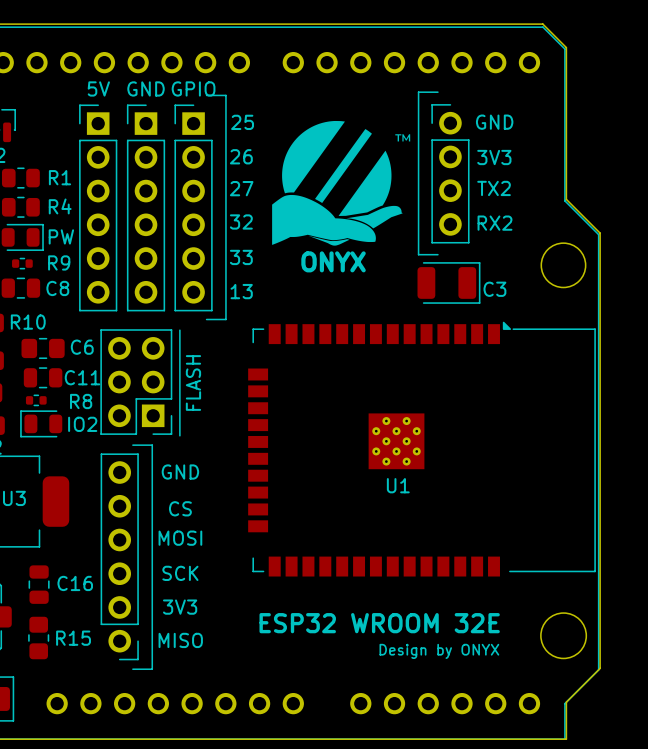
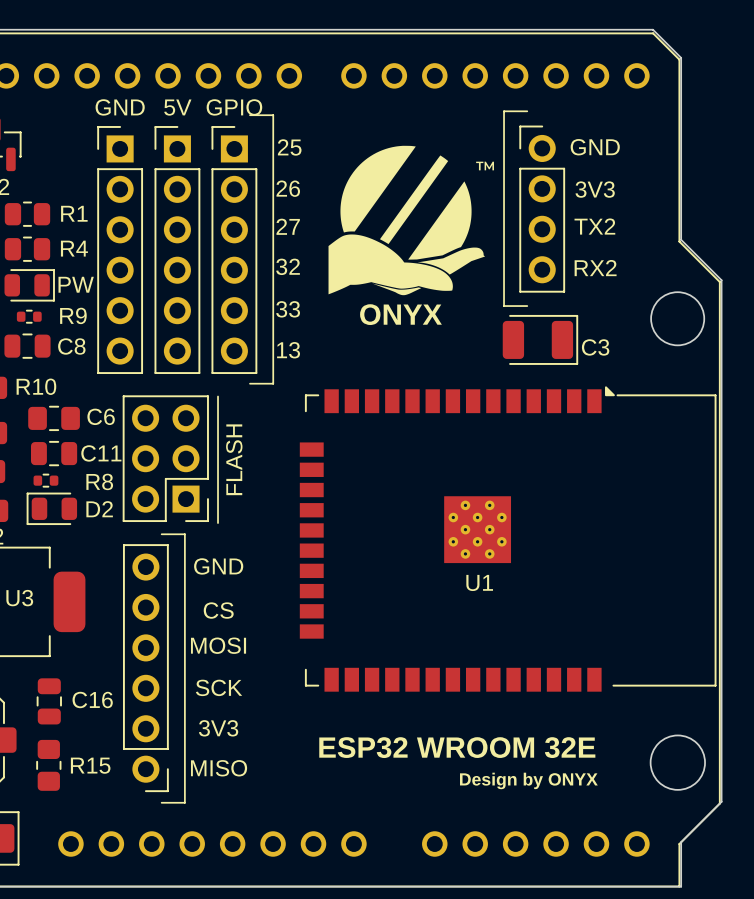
5V name: 5V (98, 88) -> GND (120, 107)
GND name: GND (146, 88) -> 5V (177, 107)
IO2 name: IO2 (82, 424) -> D2 (99, 509)

